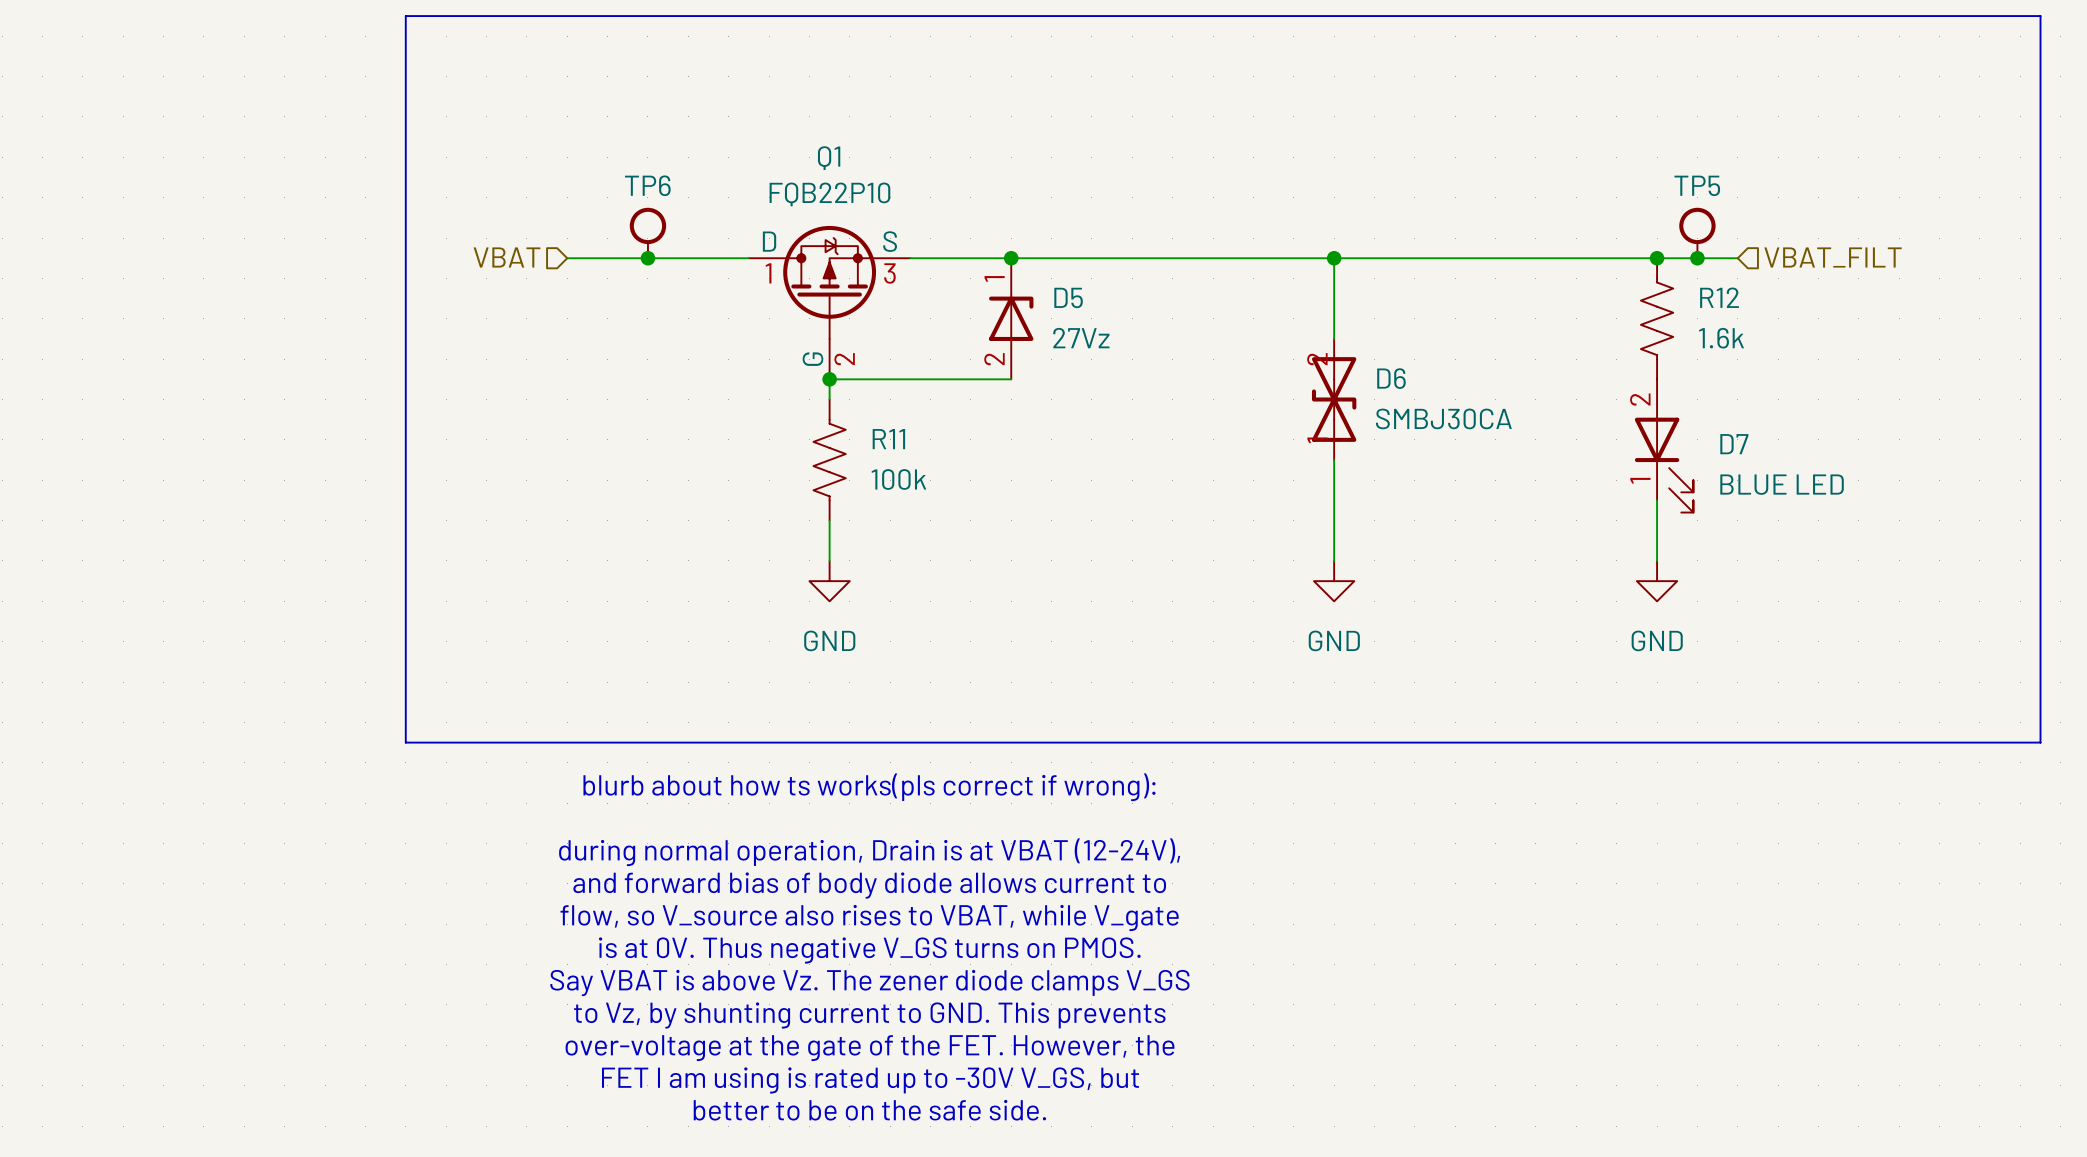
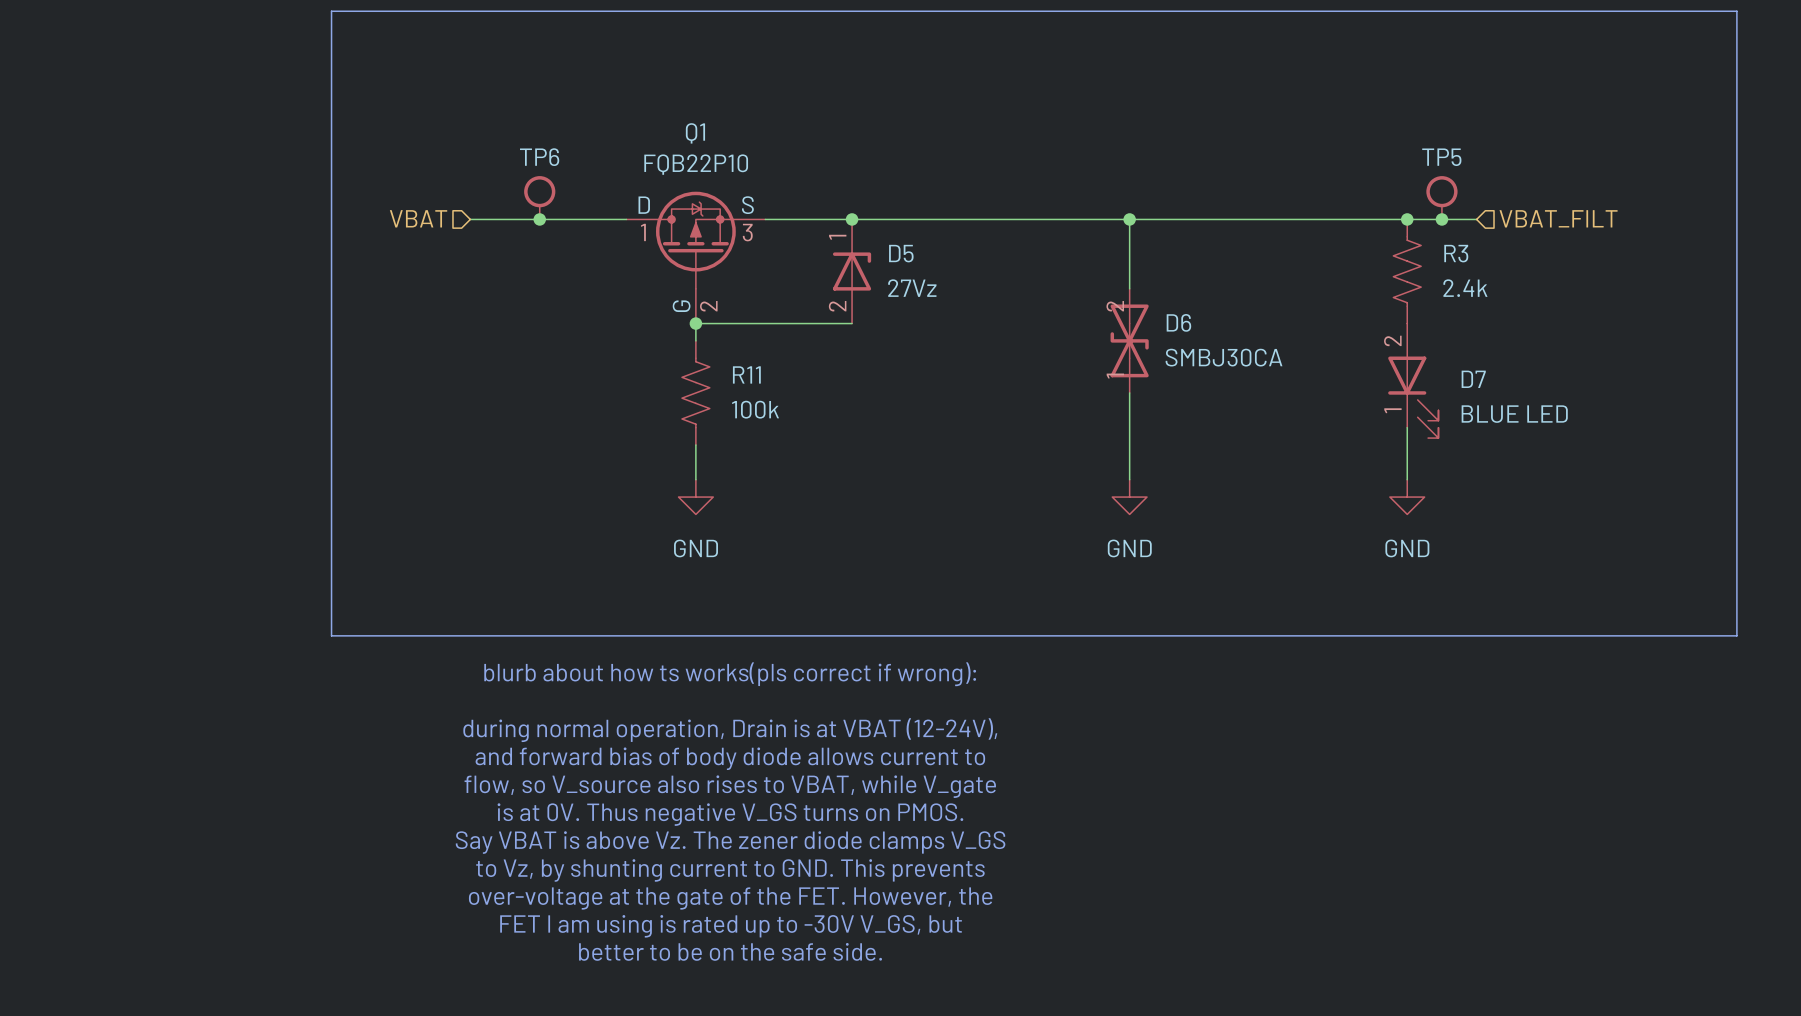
R12 name: R12 (1719, 297) -> R3 (1456, 253)
R12 value: 1.6k (1721, 338) -> 2.4k (1465, 288)

